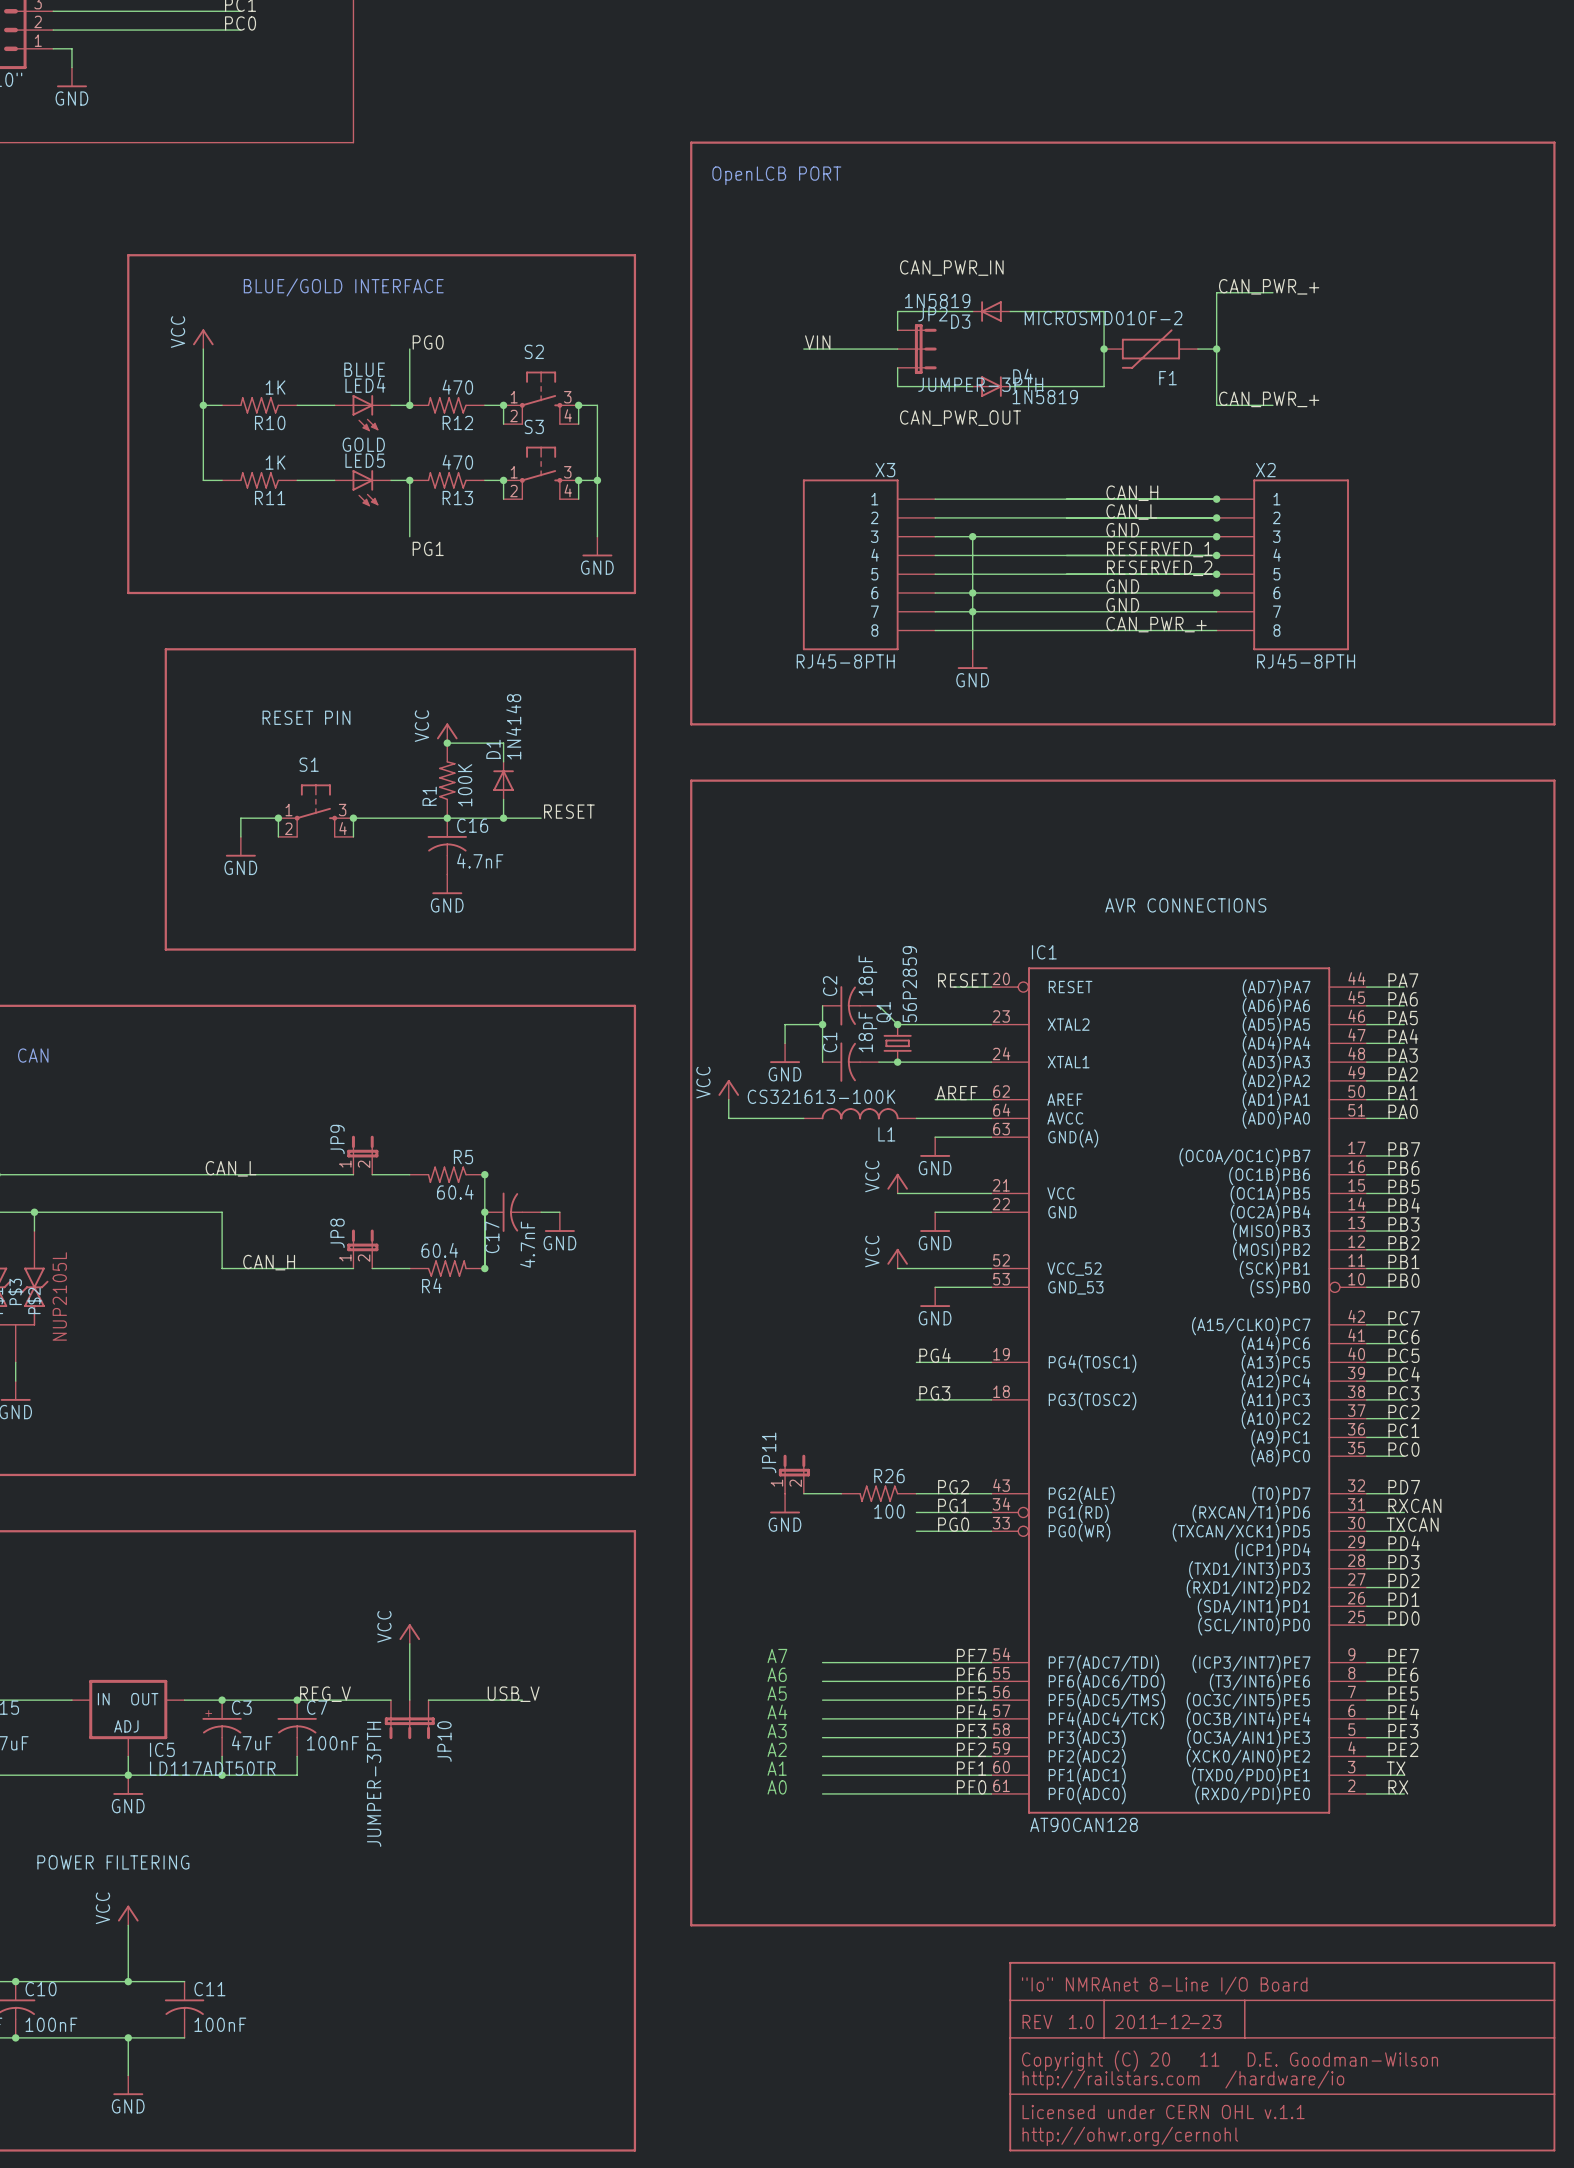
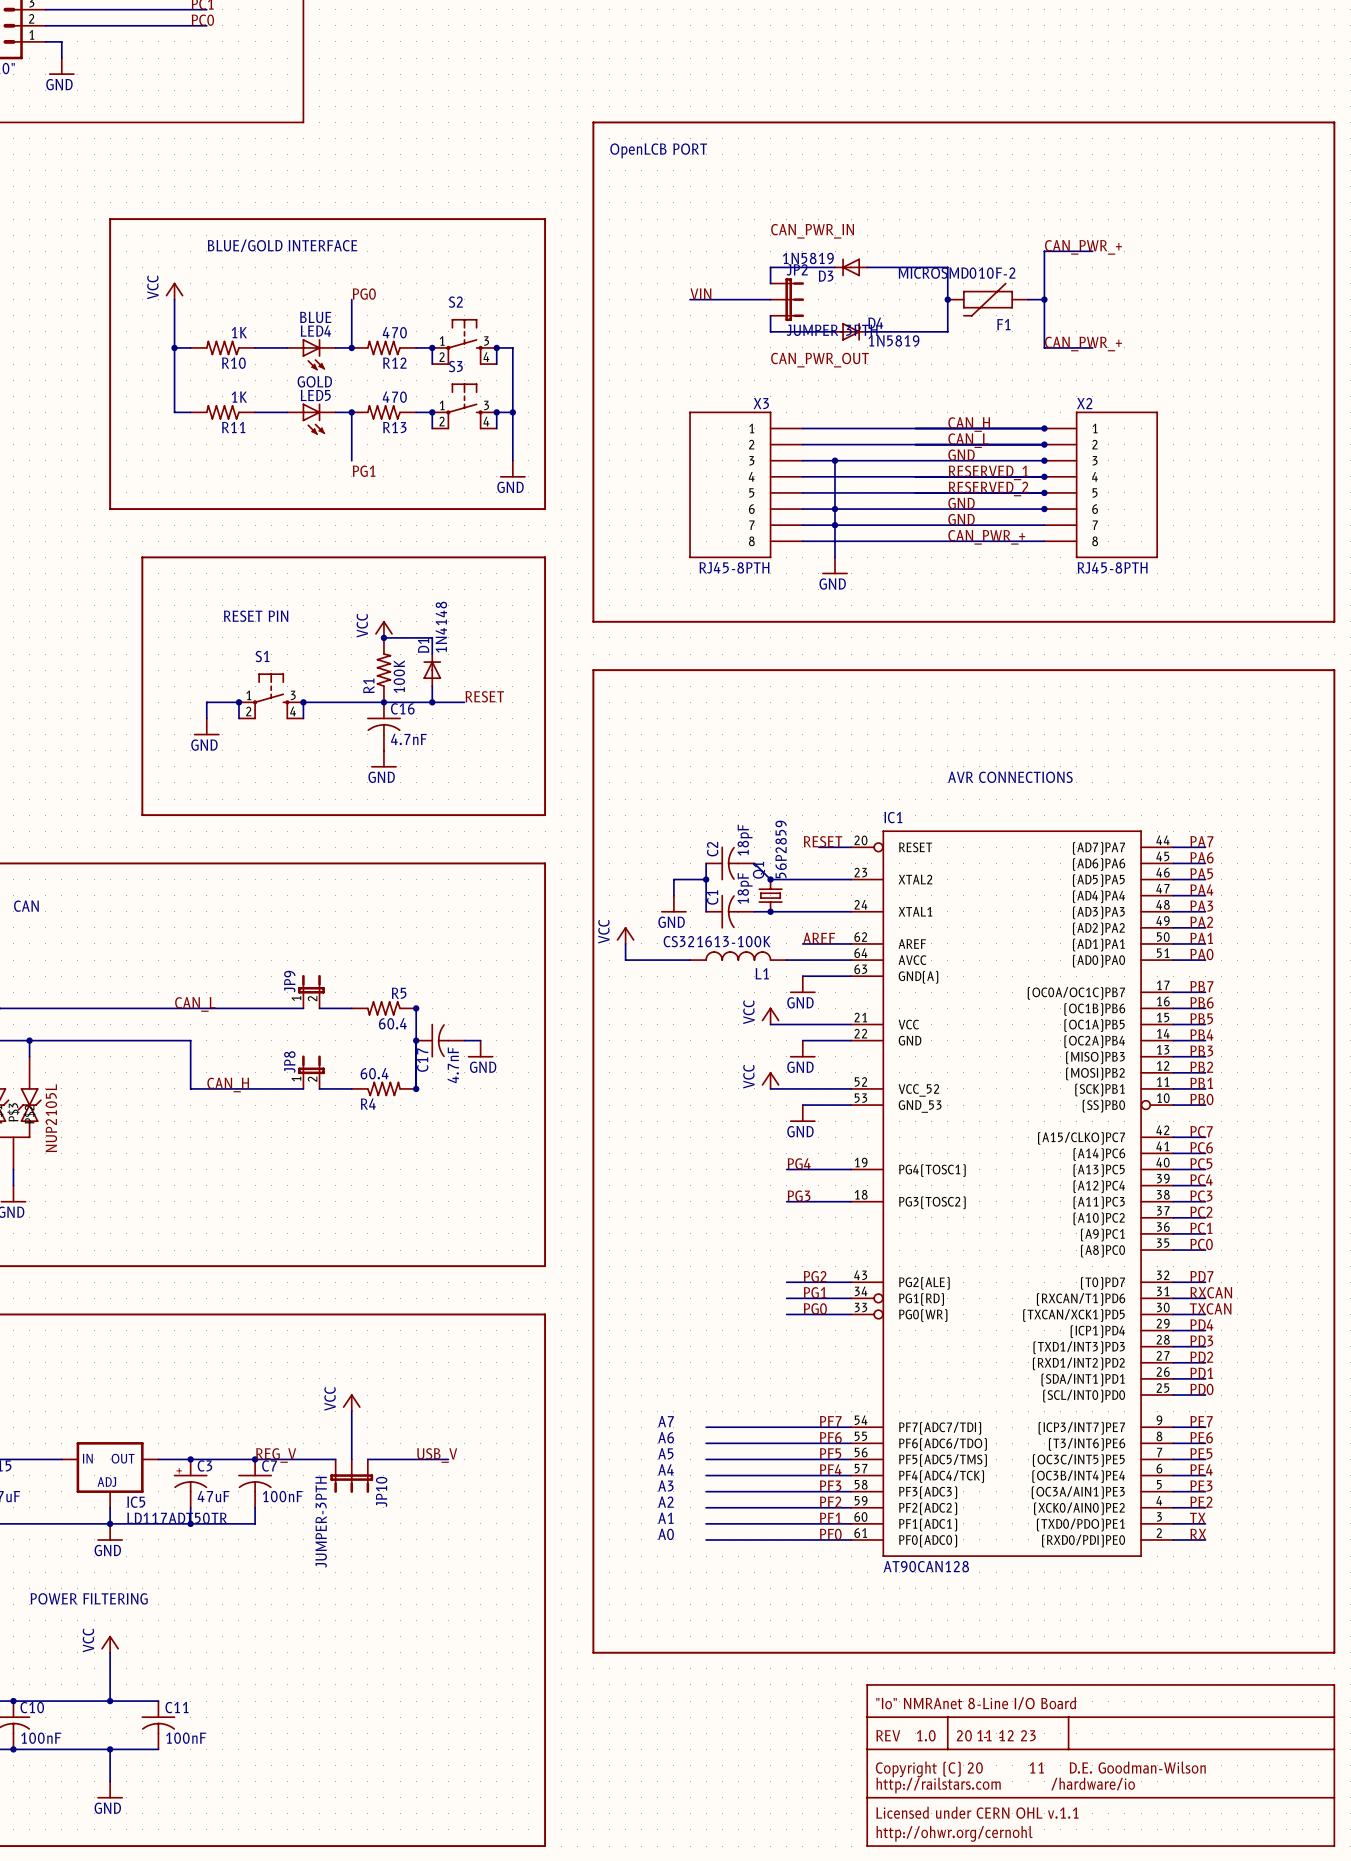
JP11: (794, 1474) -> none
wire: (803, 1493) (841, 1493) -> none
R26: 100 (878, 1493) -> none
power symbol: GND (785, 1503) -> none

